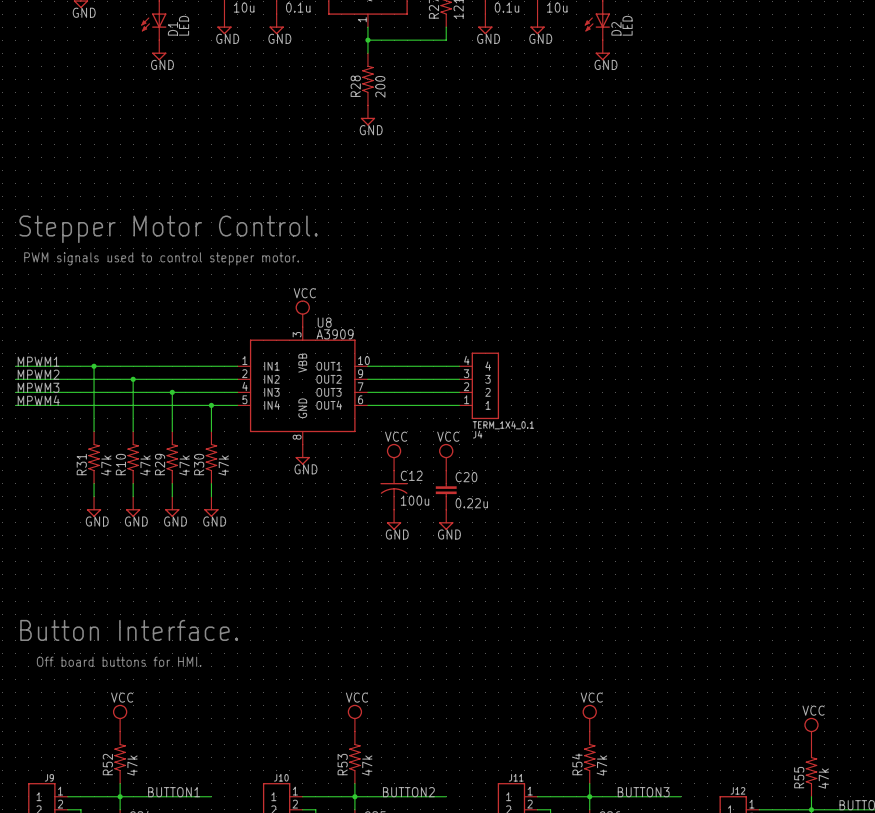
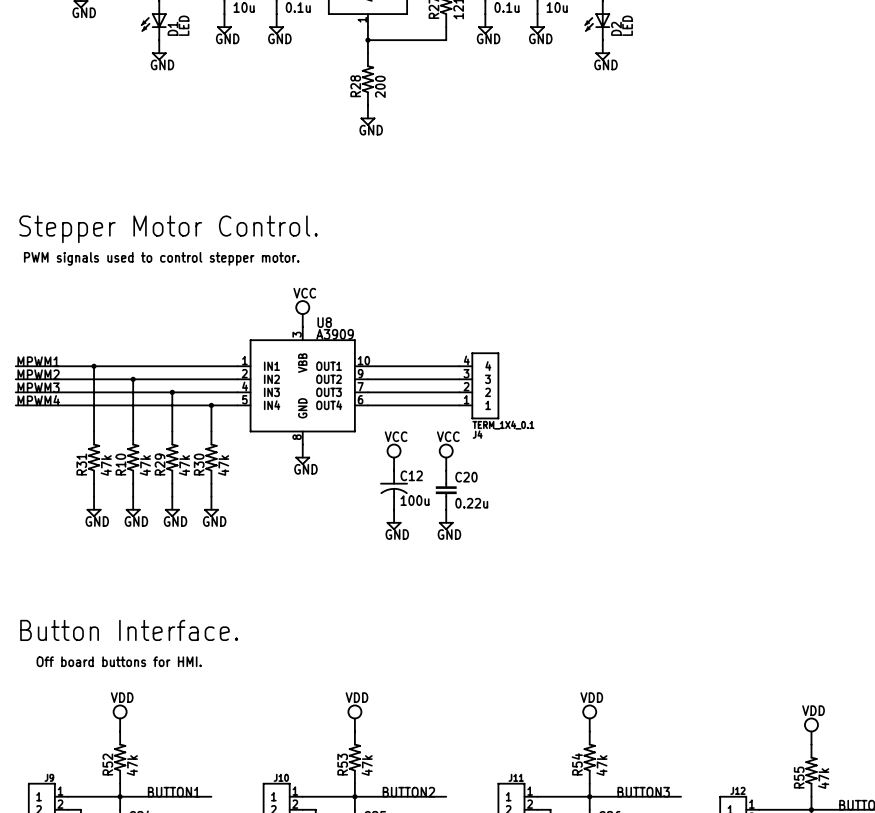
power symbol: VCC (120, 718) -> VDD (120, 718)
power symbol: VCC (354, 718) -> VDD (354, 718)
power symbol: VCC (589, 718) -> VDD (589, 718)
power symbol: VCC (811, 731) -> VDD (811, 731)

